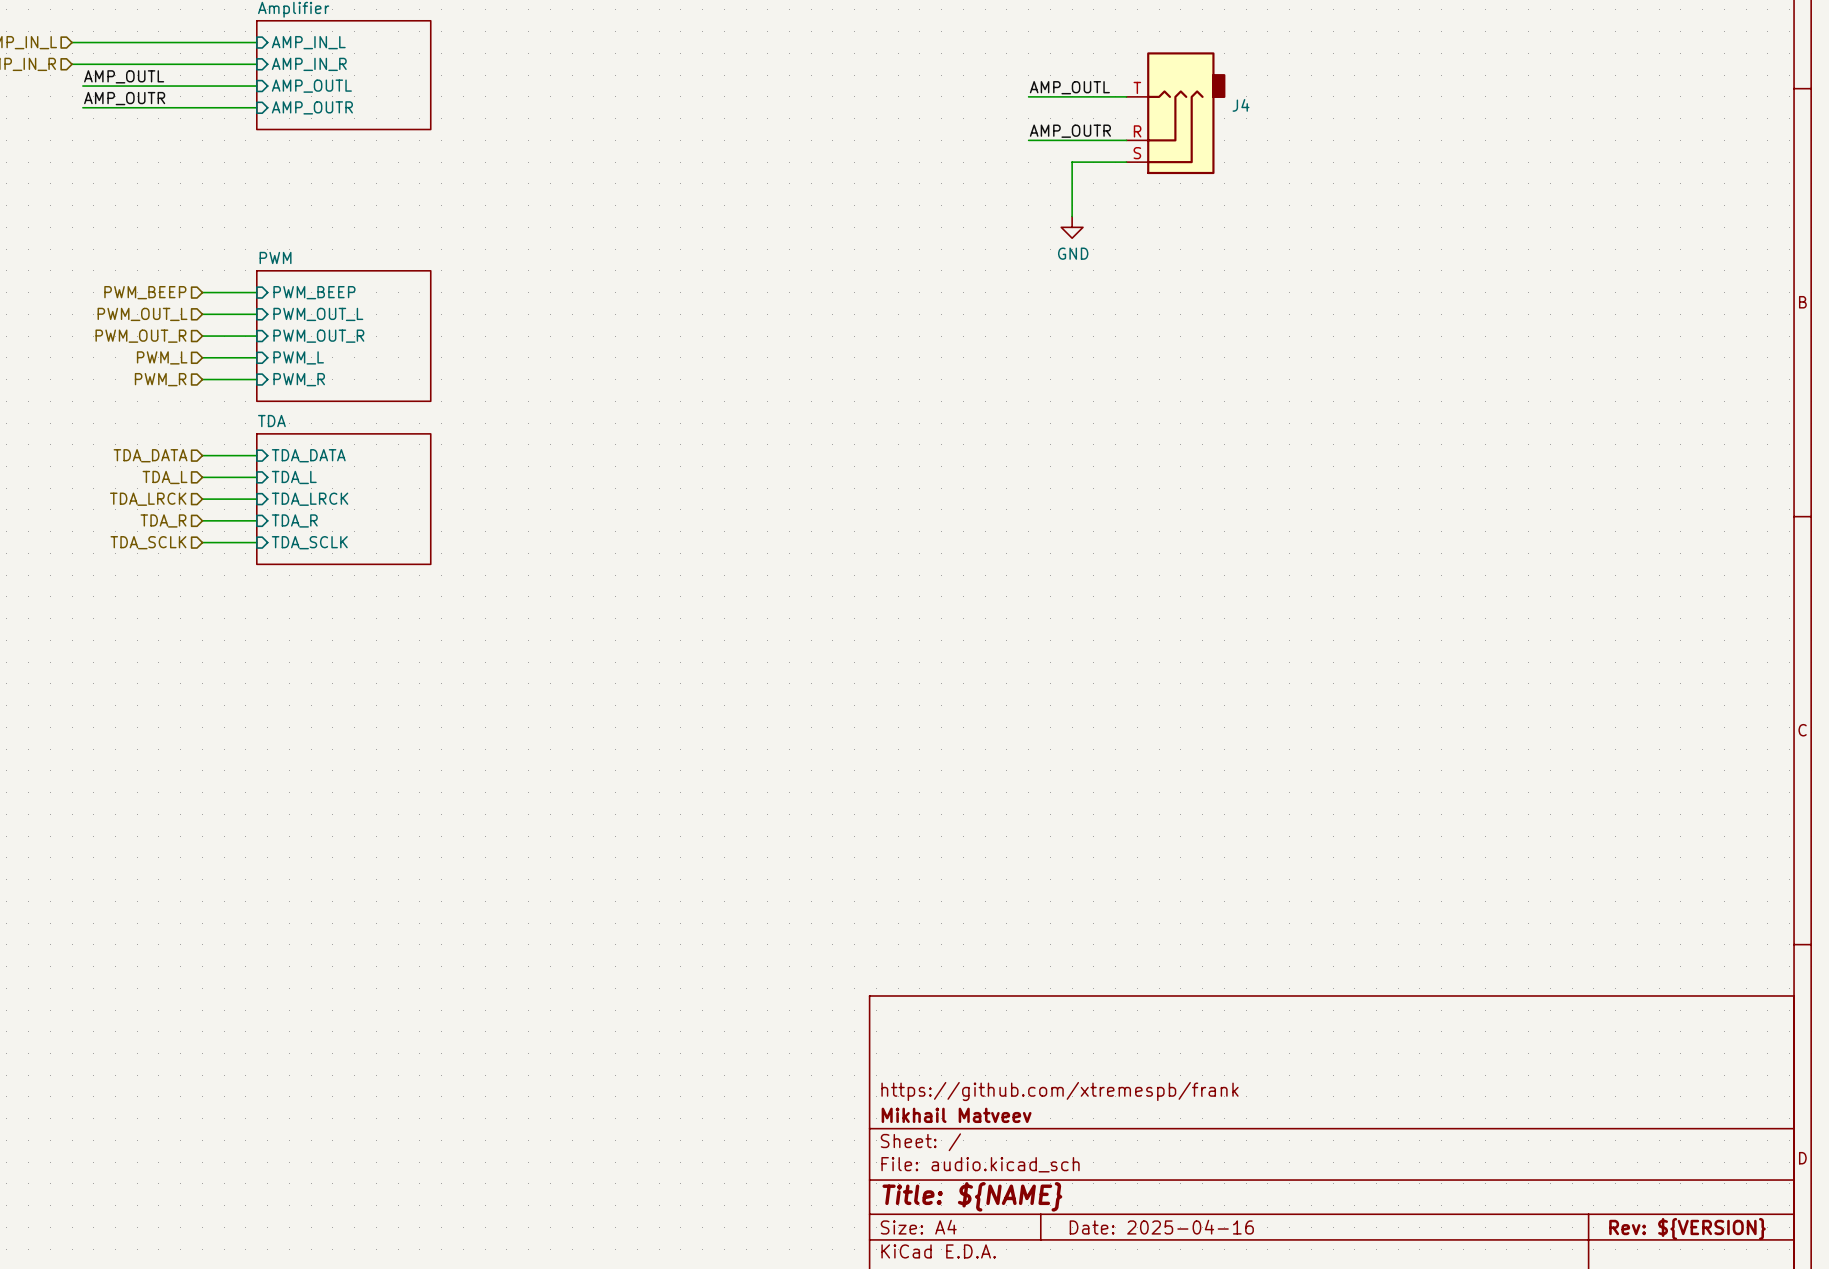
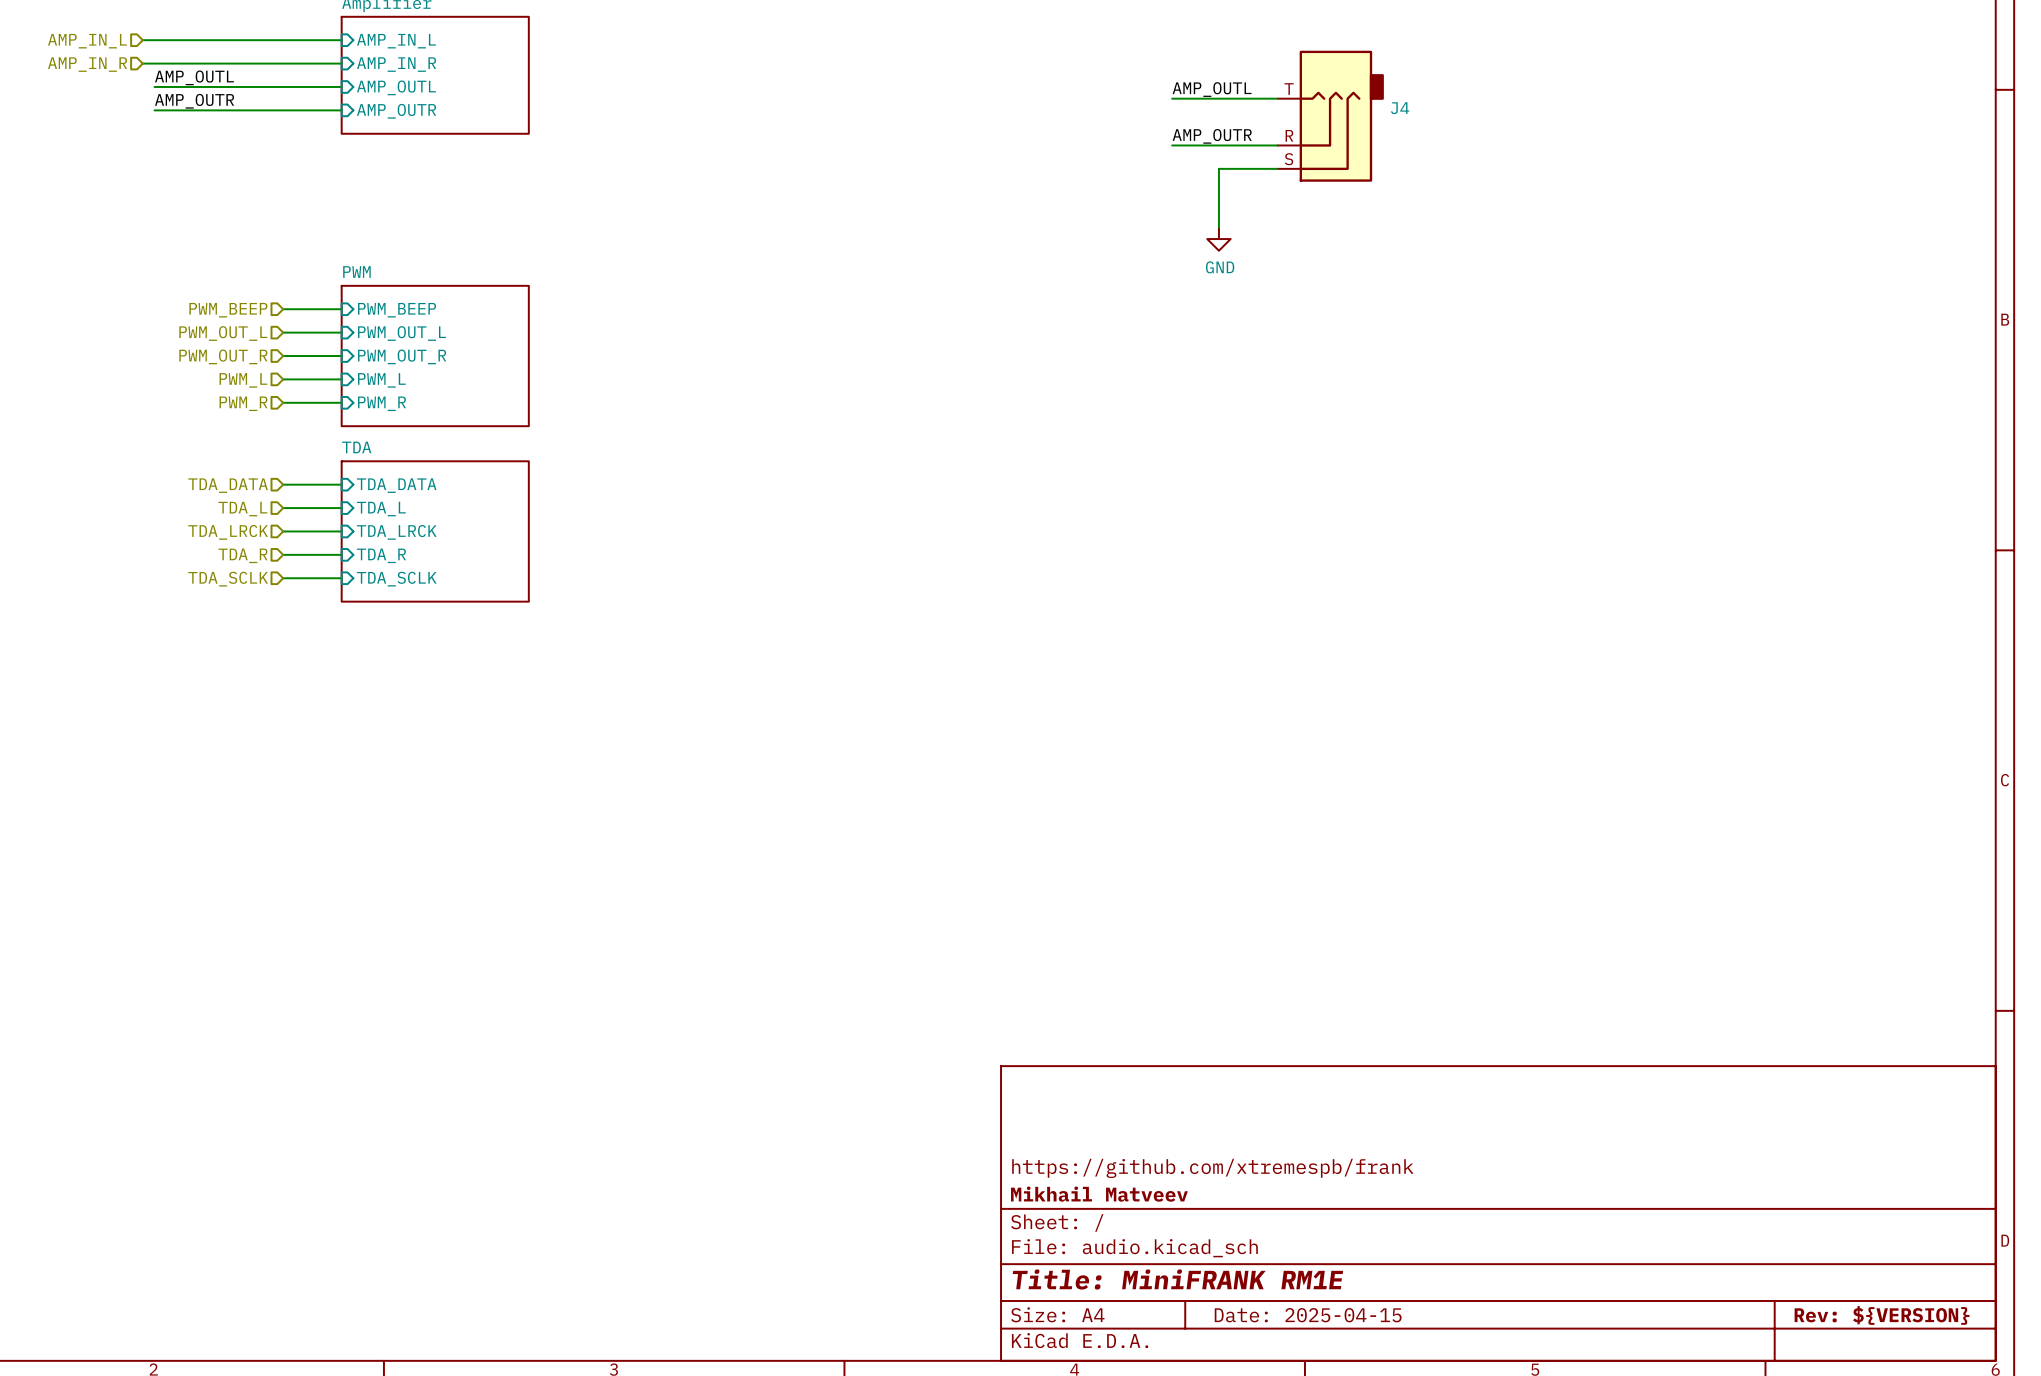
title block: Title: ${NAME} (972, 1196) -> Title: MiniFRANK RM1E (1177, 1279)
title block: Date: 2025-04-16 (1161, 1227) -> Date: 2025-04-15 (1308, 1315)

